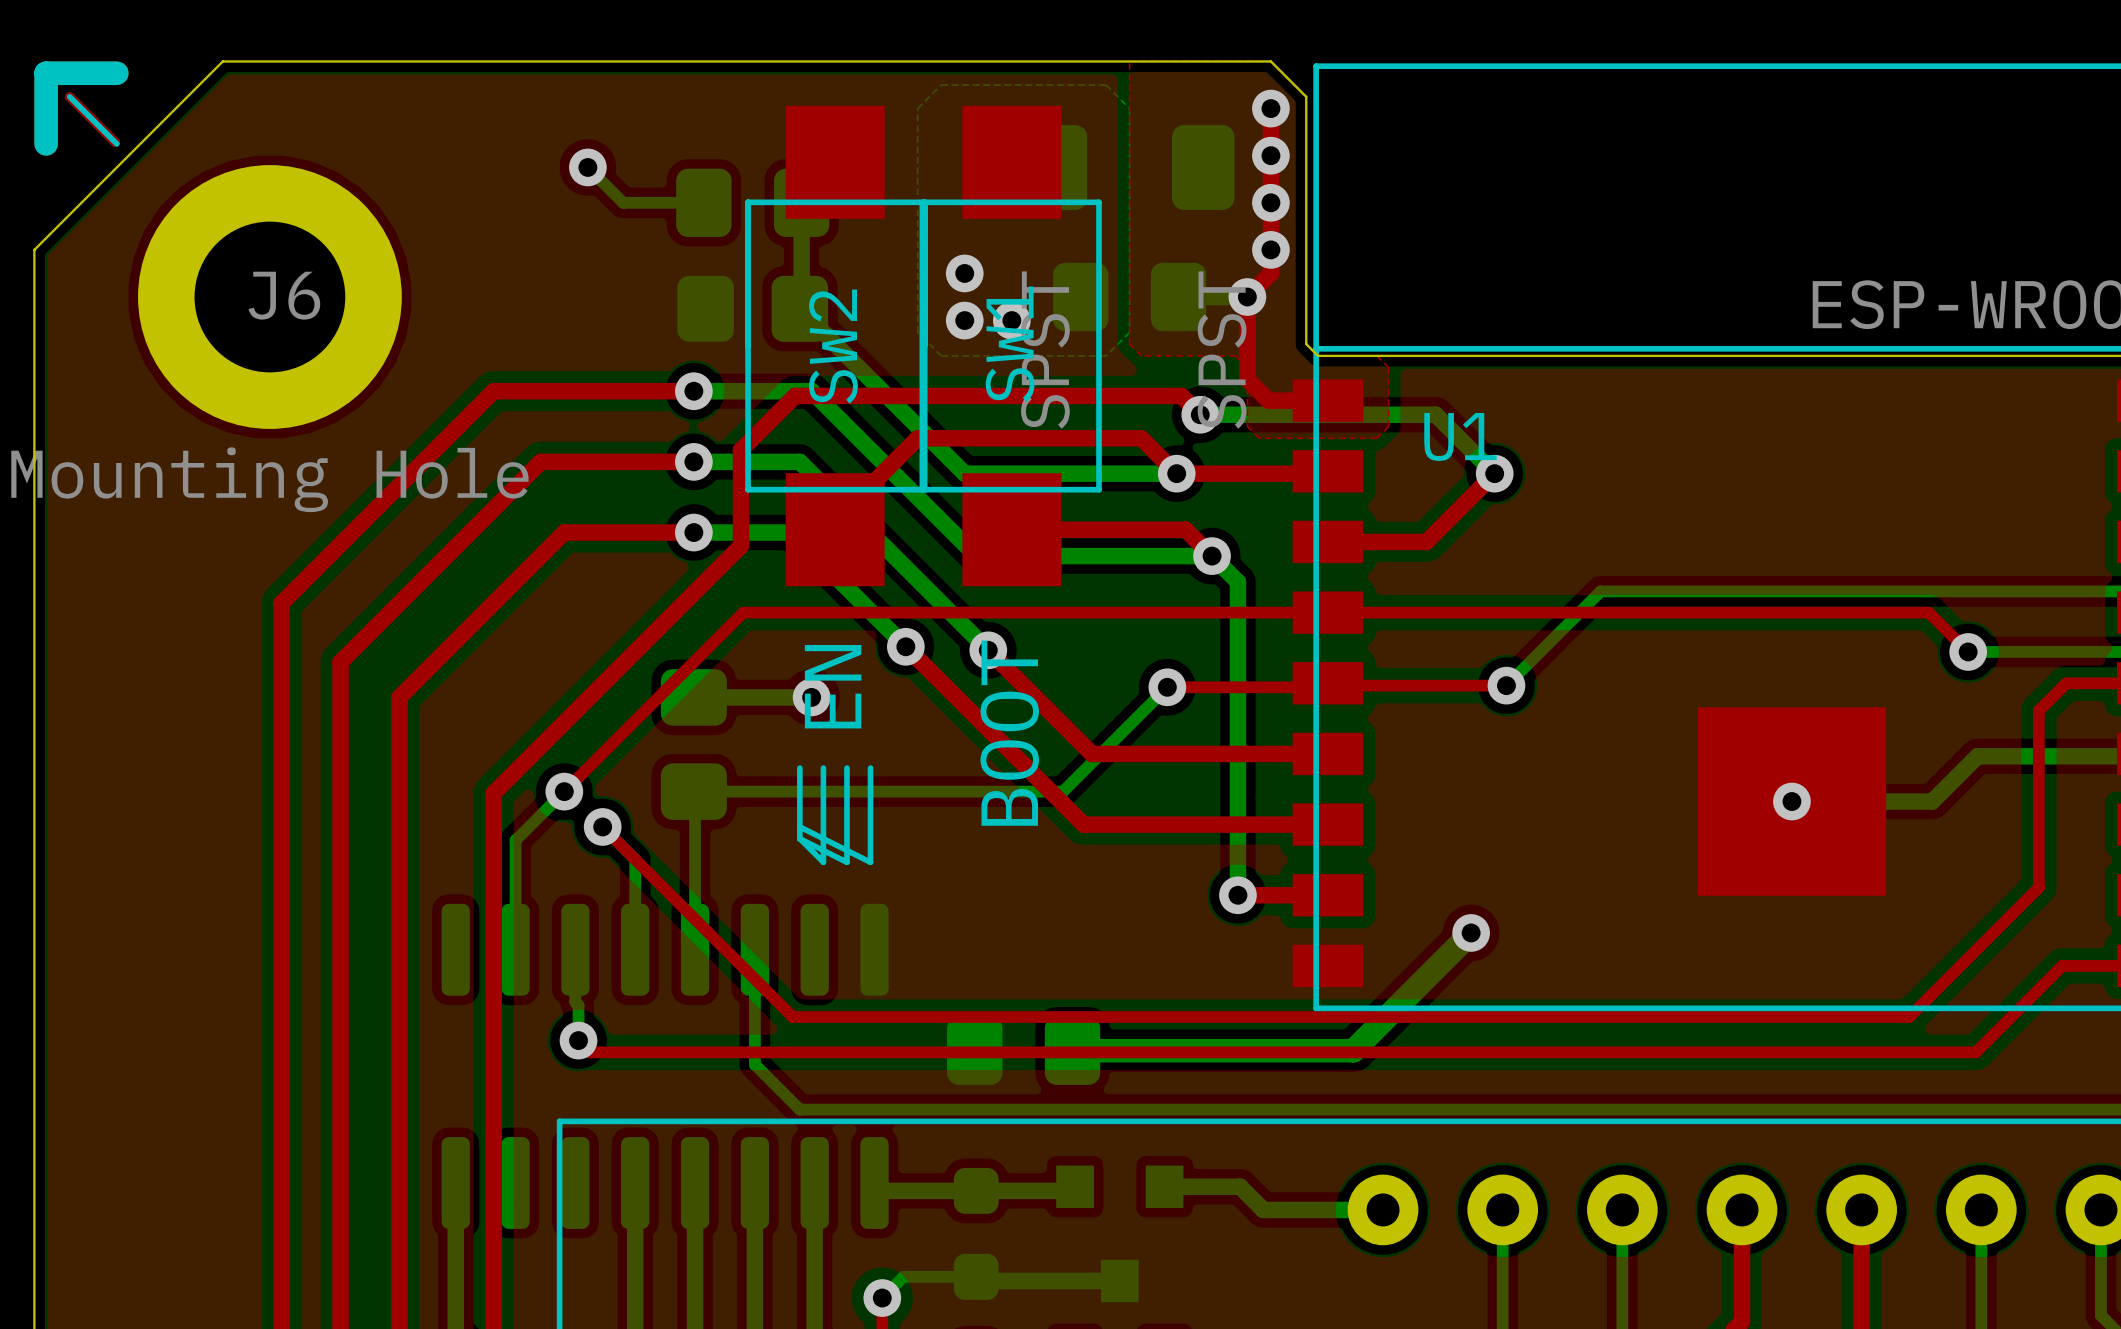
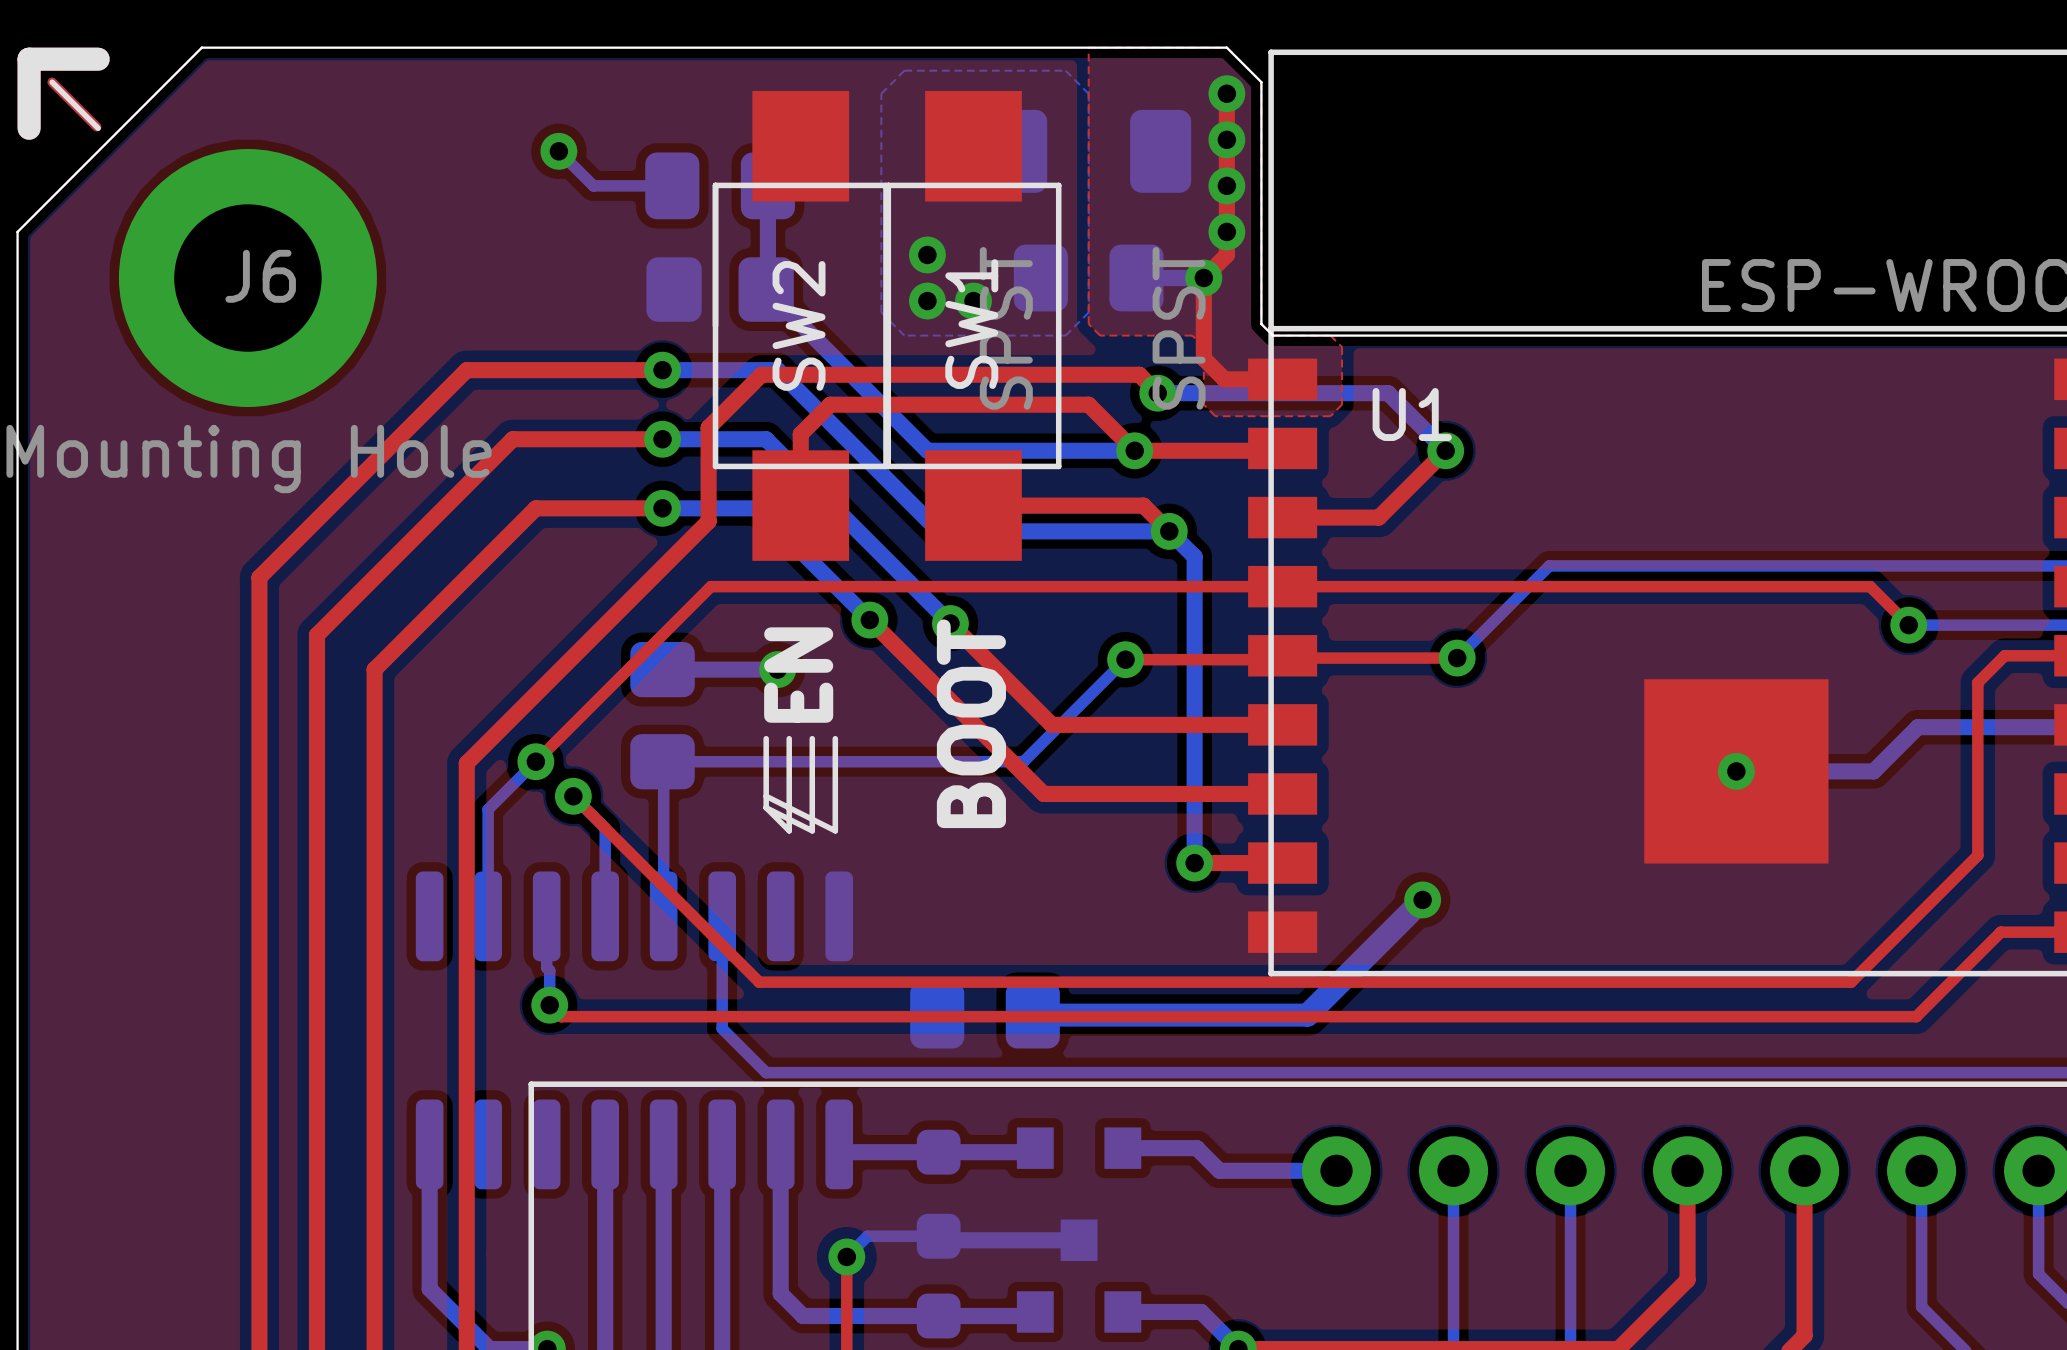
top track: (1141, 438) (917, 438) (835, 520) -> (1100, 416) (1088, 404) (830, 404) (800, 434) (800, 496)

